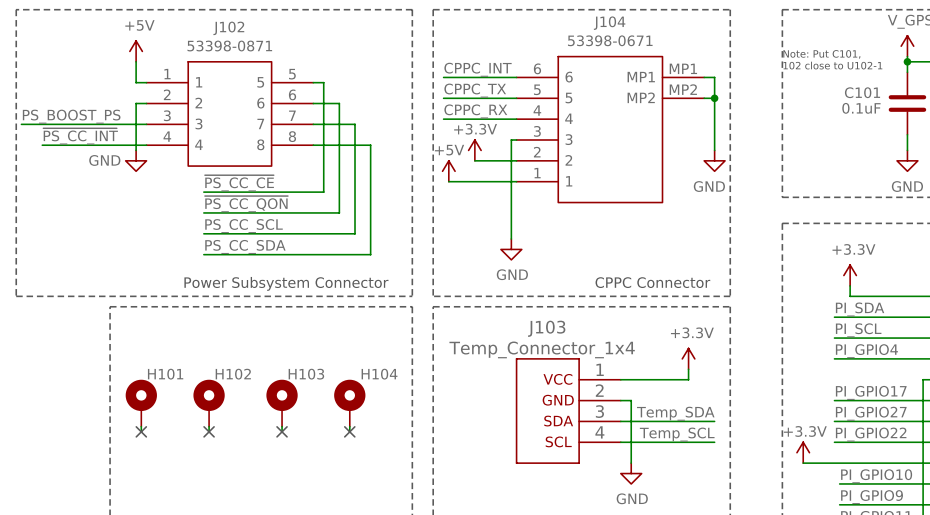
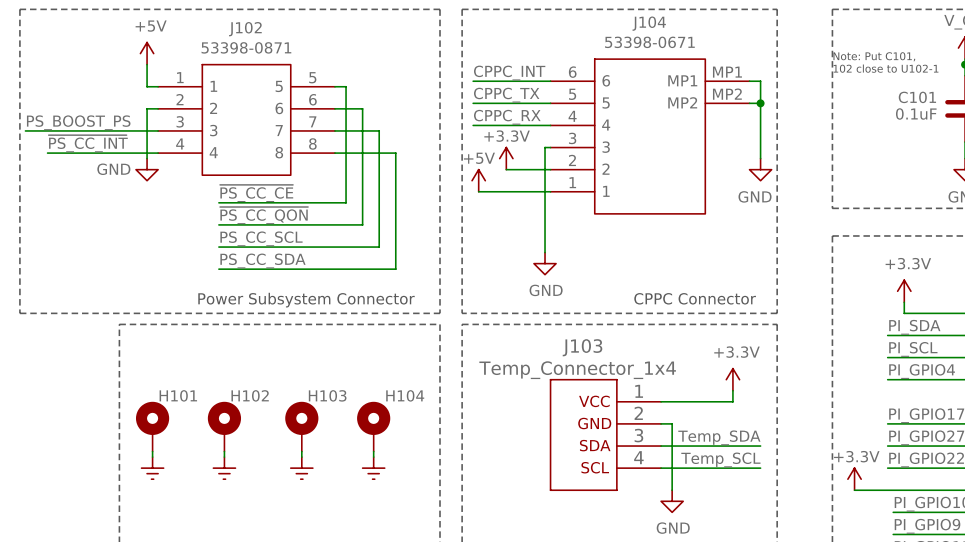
no-connect mark: (141, 431) -> none
no-connect mark: (209, 431) -> none
no-connect mark: (282, 431) -> none
no-connect mark: (349, 431) -> none
power symbol: none -> (152, 468)
power symbol: none -> (224, 468)
power symbol: none -> (301, 468)
power symbol: none -> (373, 468)

